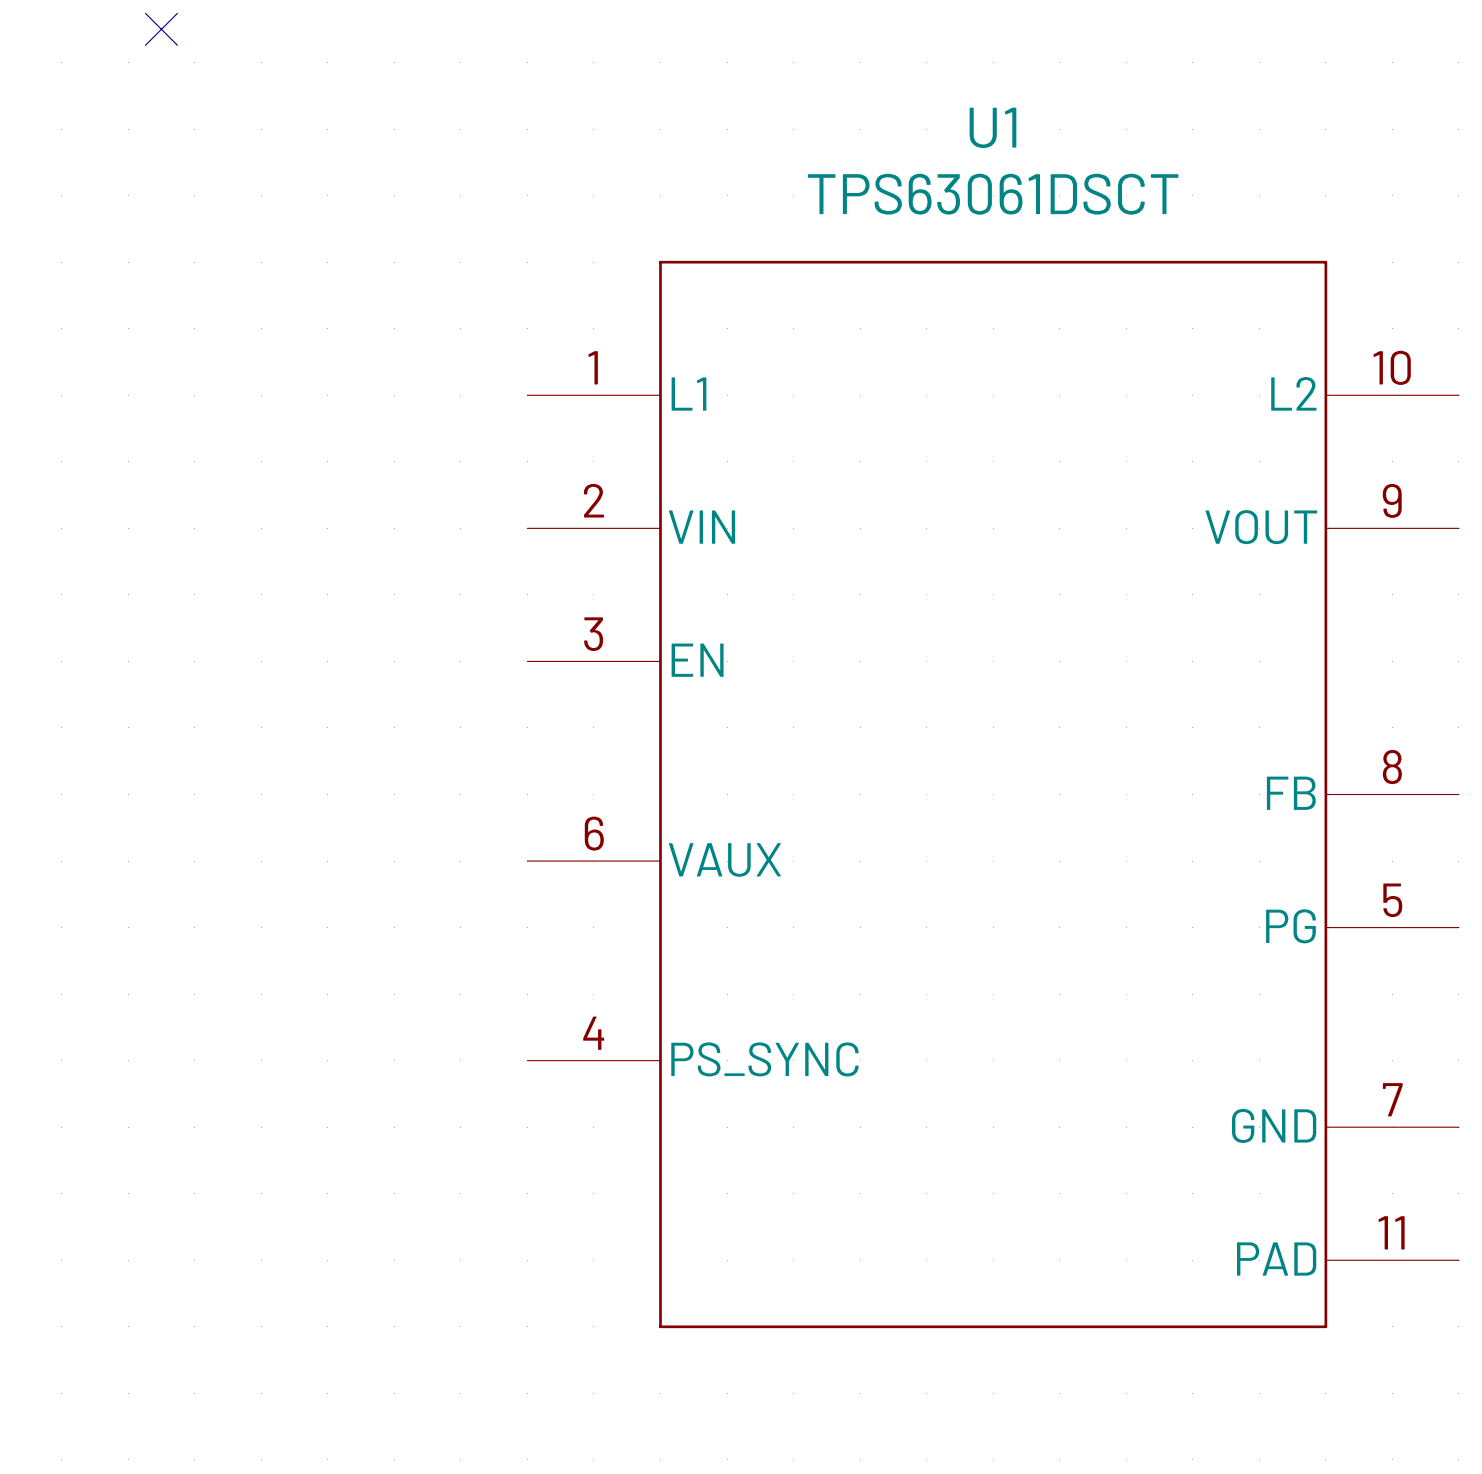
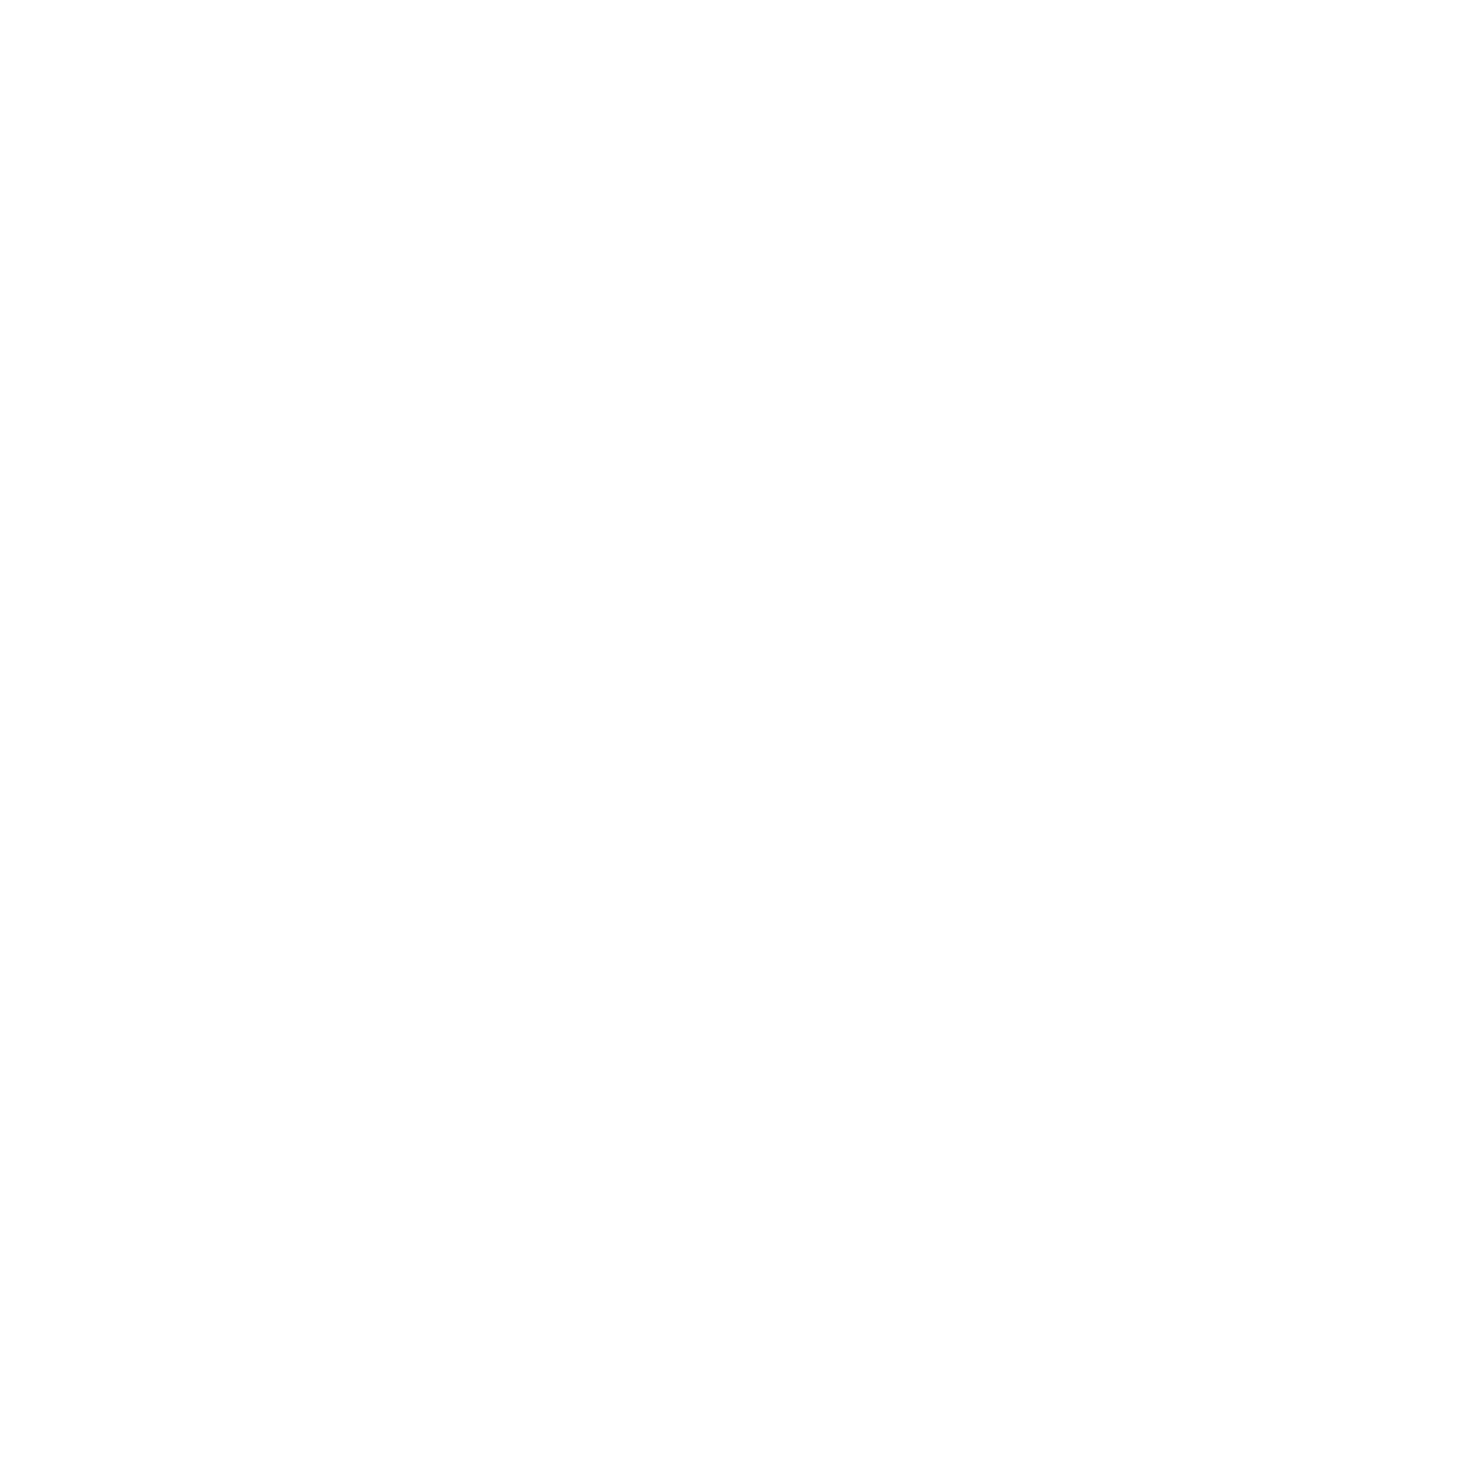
no-connect mark: (161, 29) -> none
U1: TPS63061DSCT (993, 794) -> none

